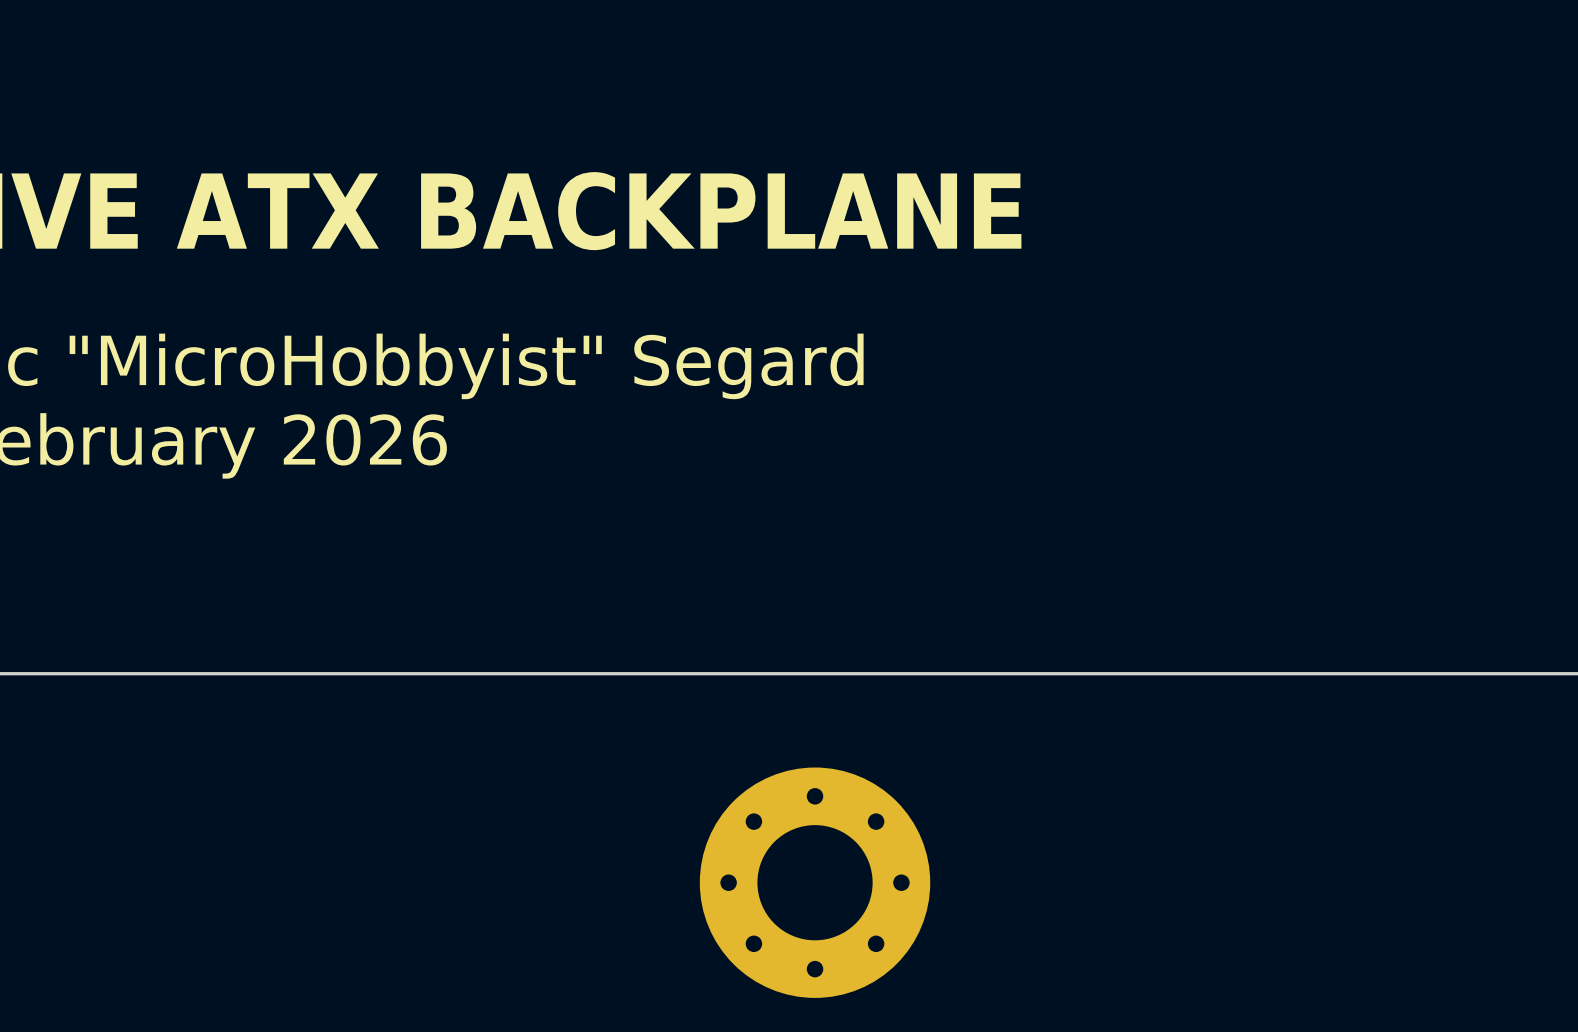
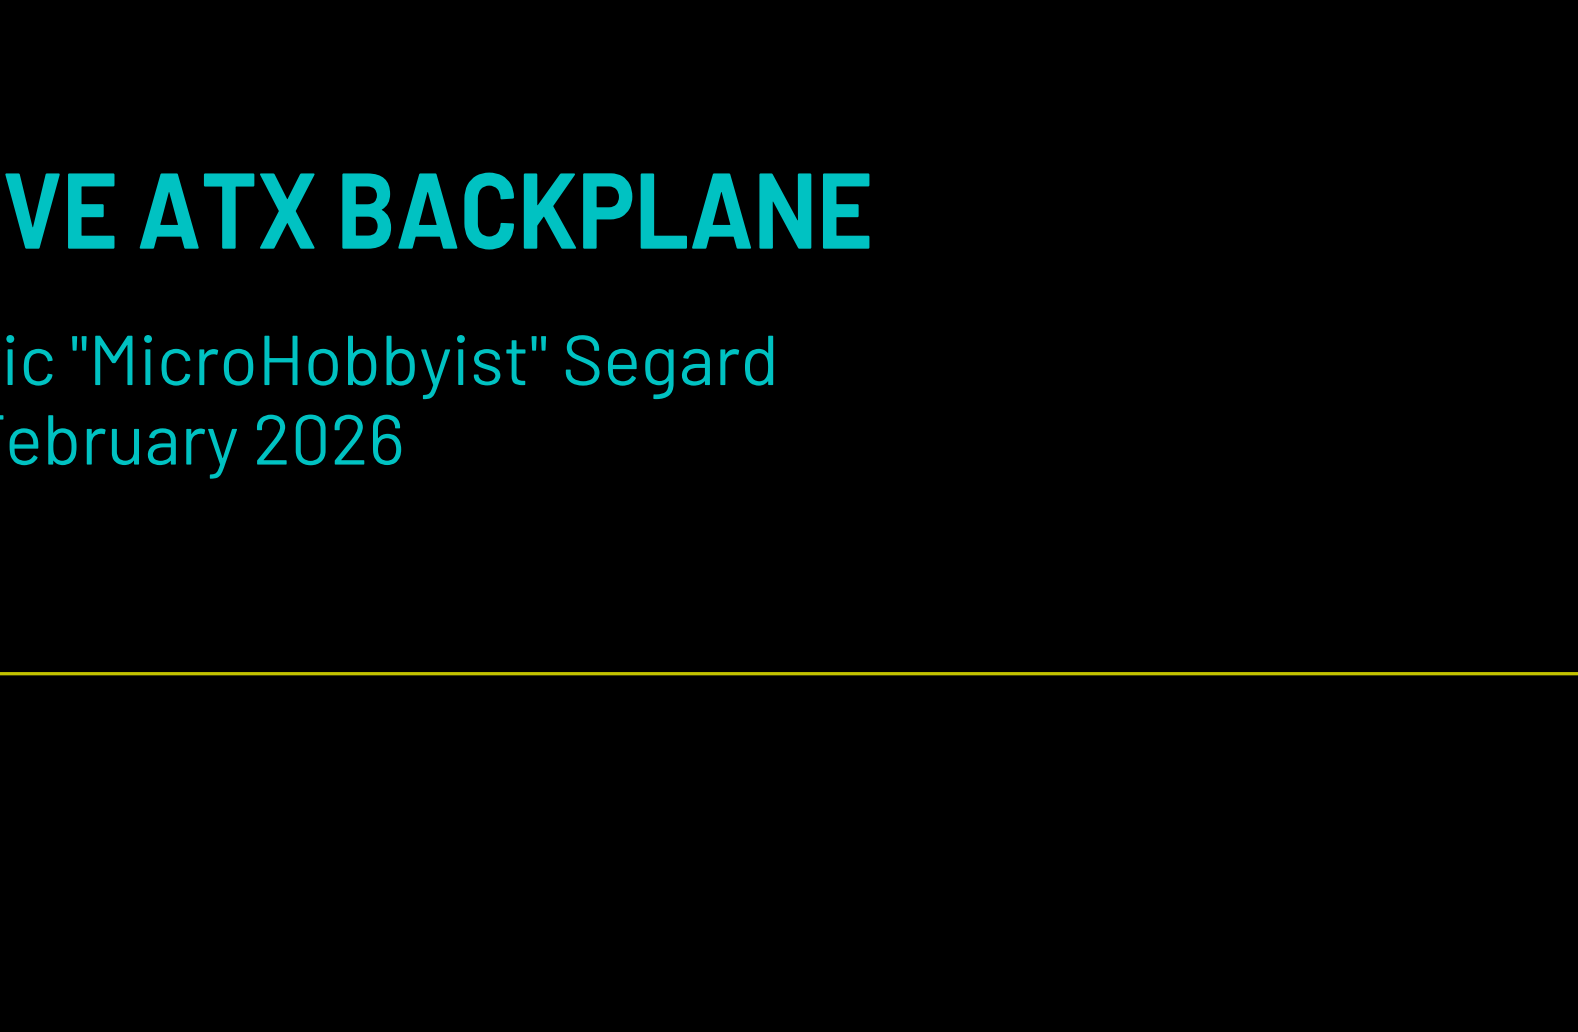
part: (815, 882) -> none

